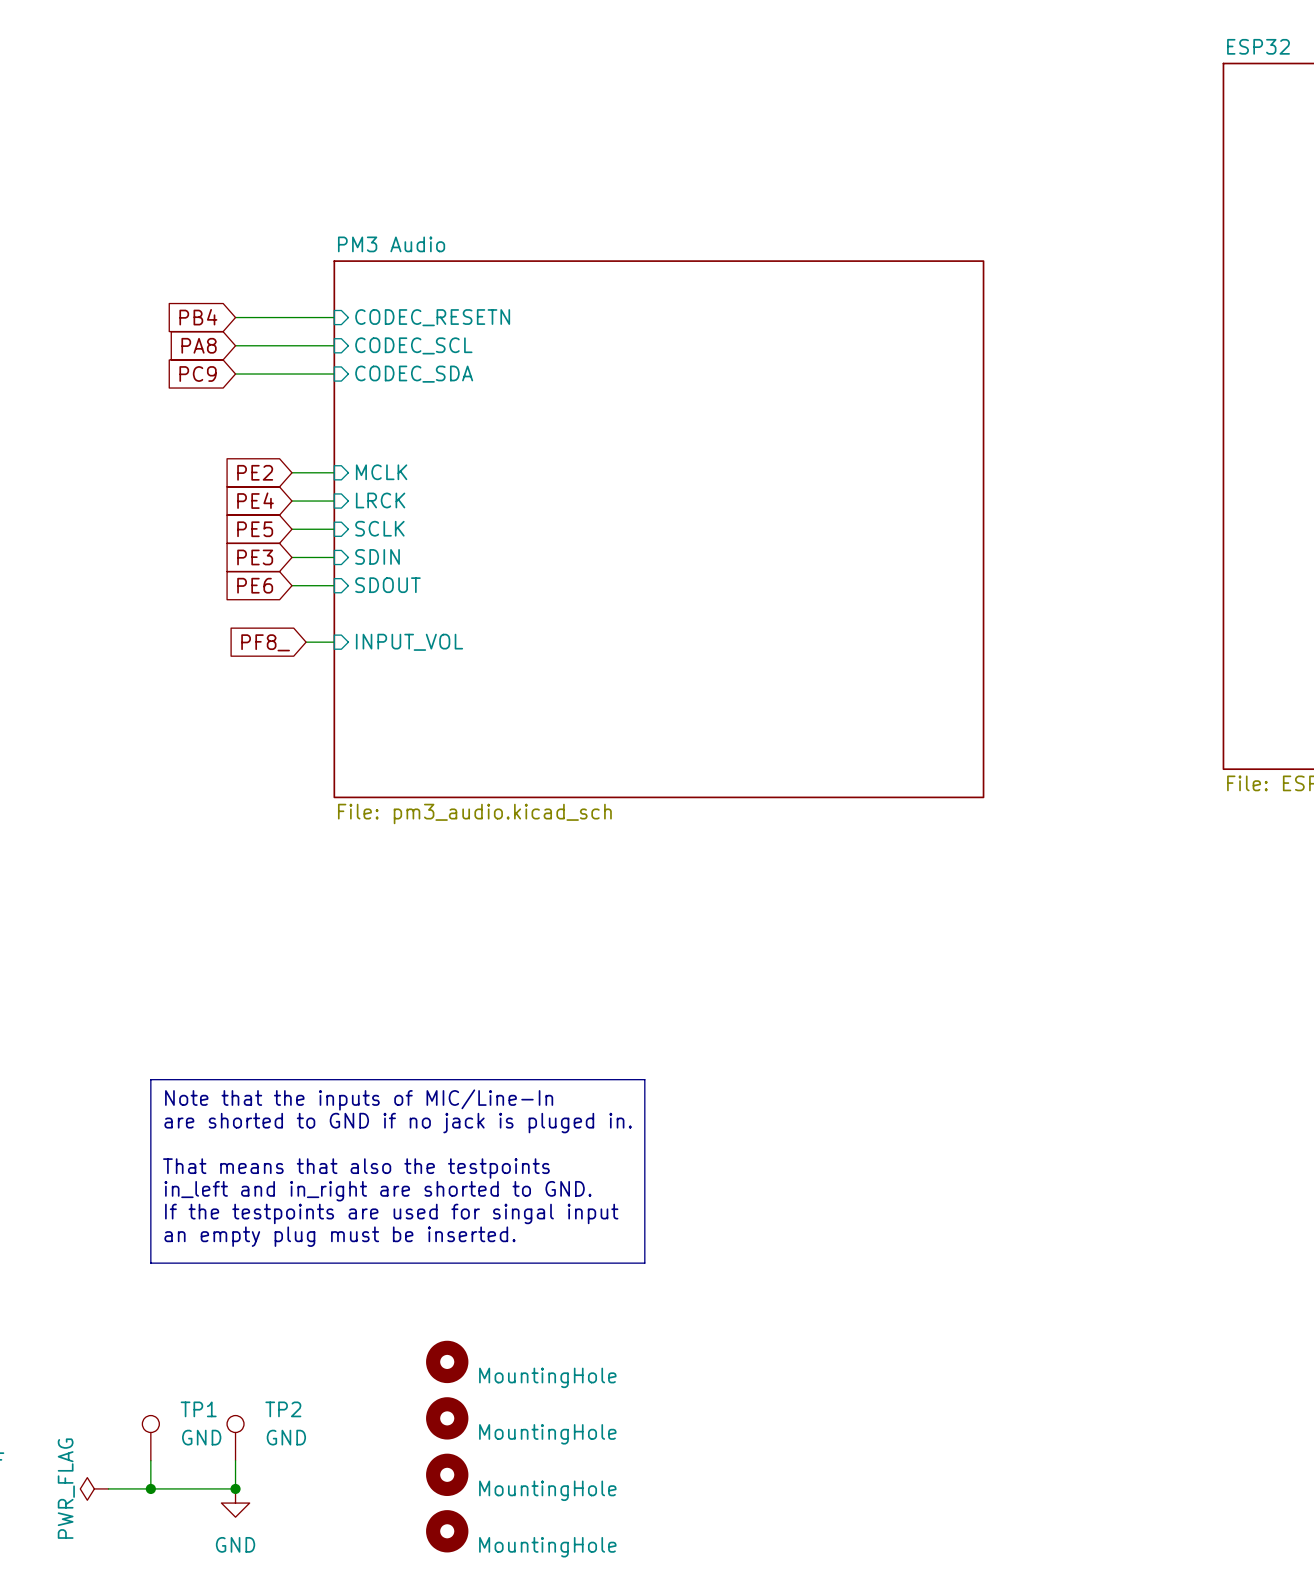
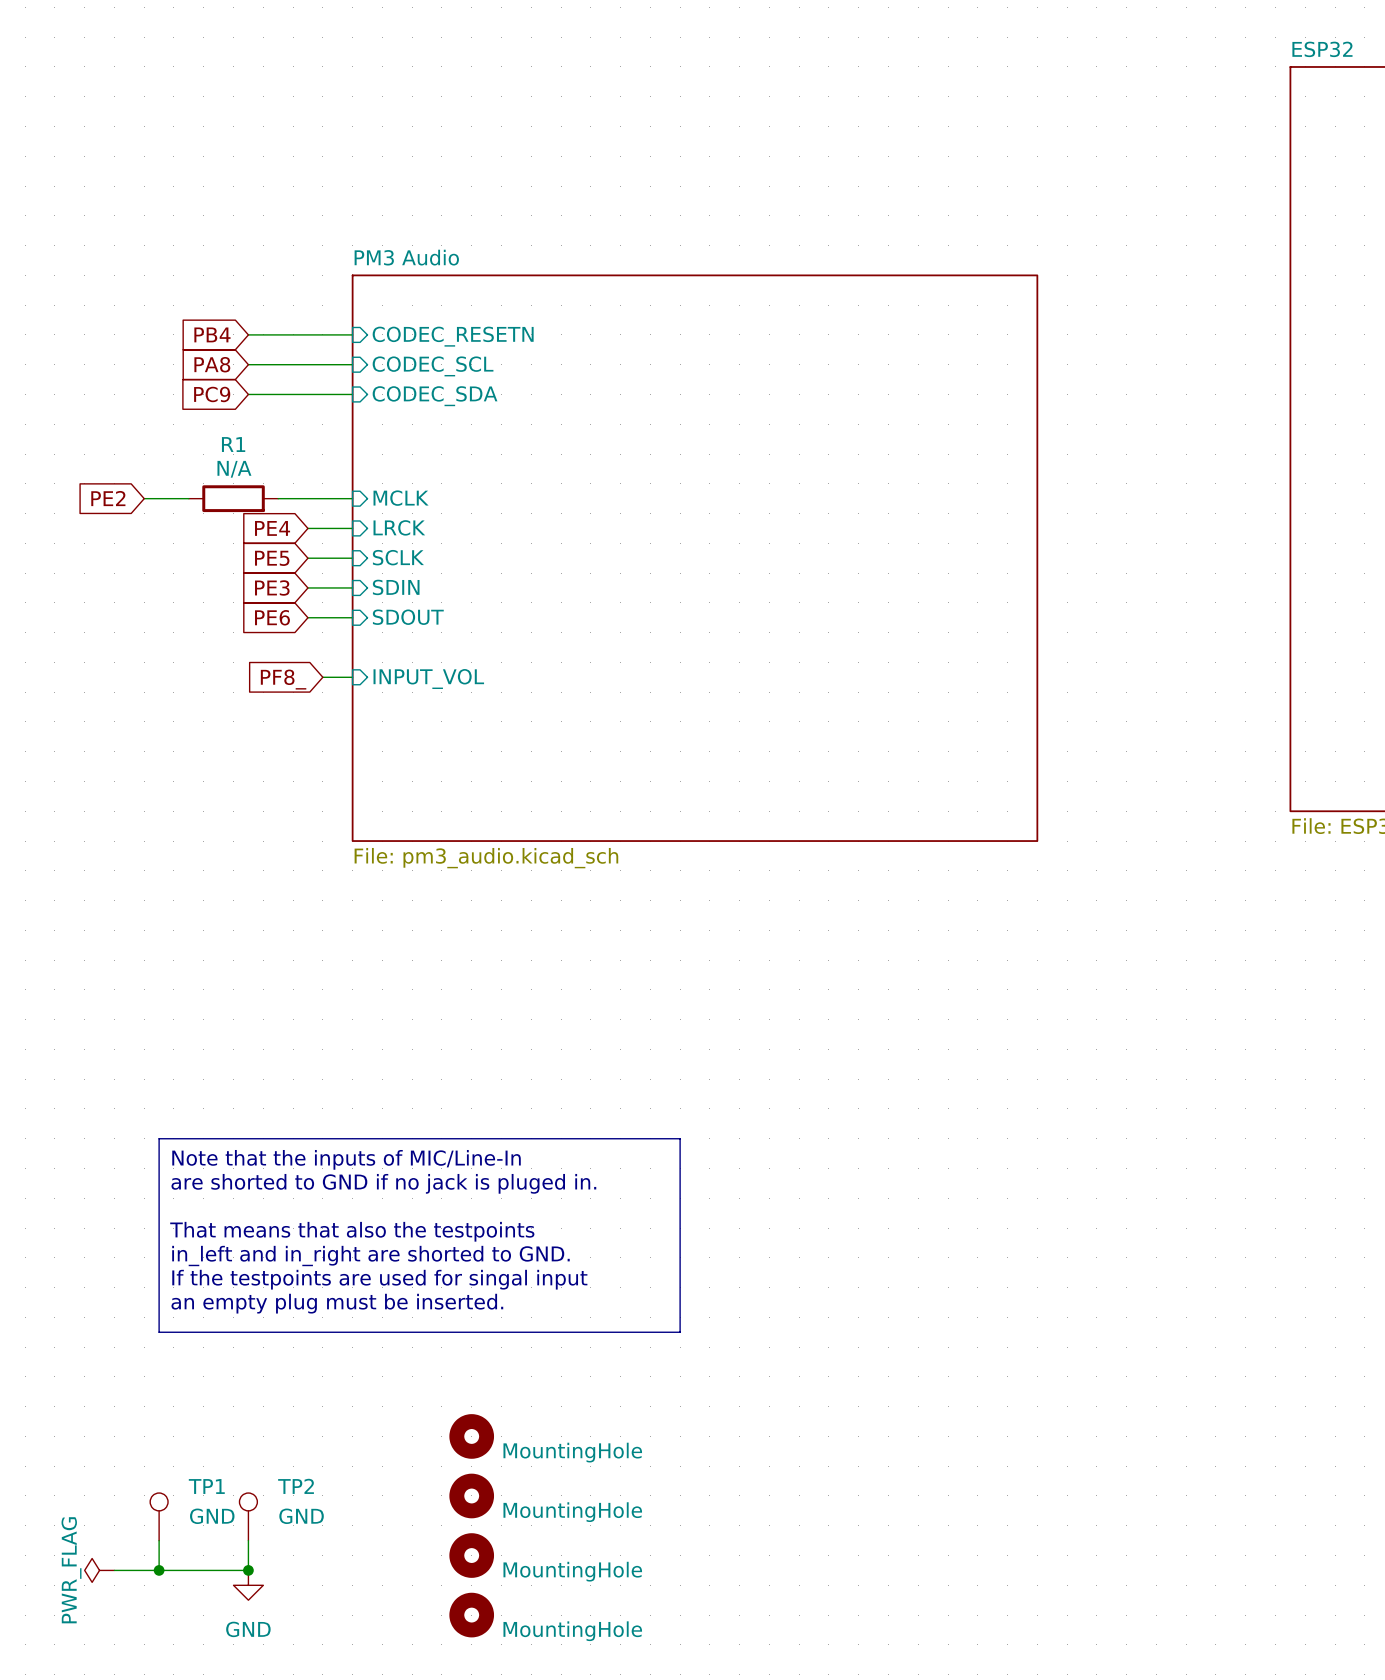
wire: none -> (144, 498) (188, 498)
R1: none -> N/A (233, 498)
global label position: PE2 (255, 472) -> PE2 (108, 498)
wire: none -> (278, 498) (307, 498)

